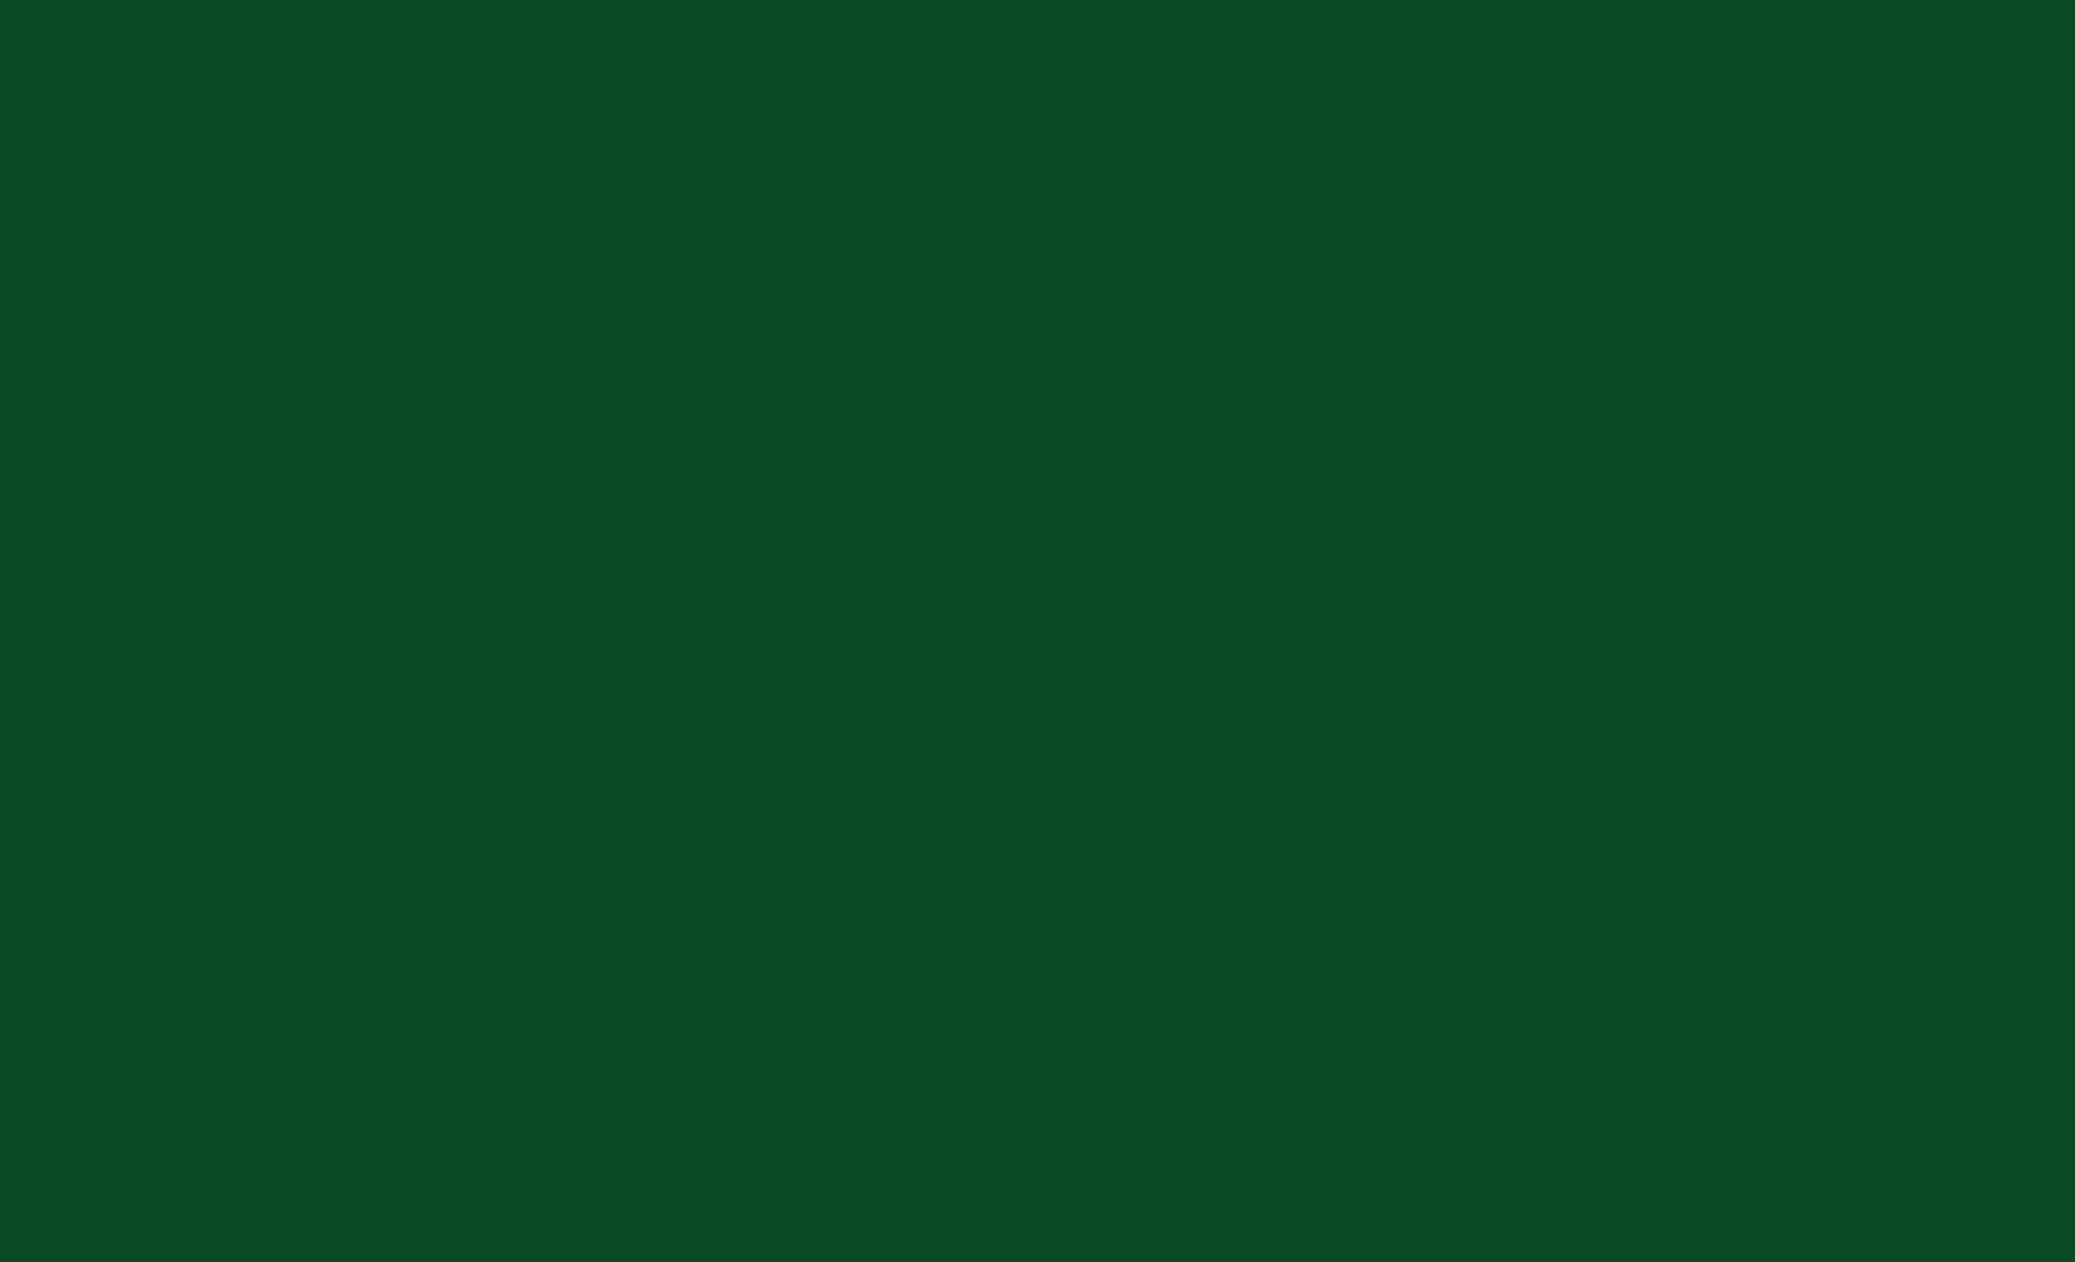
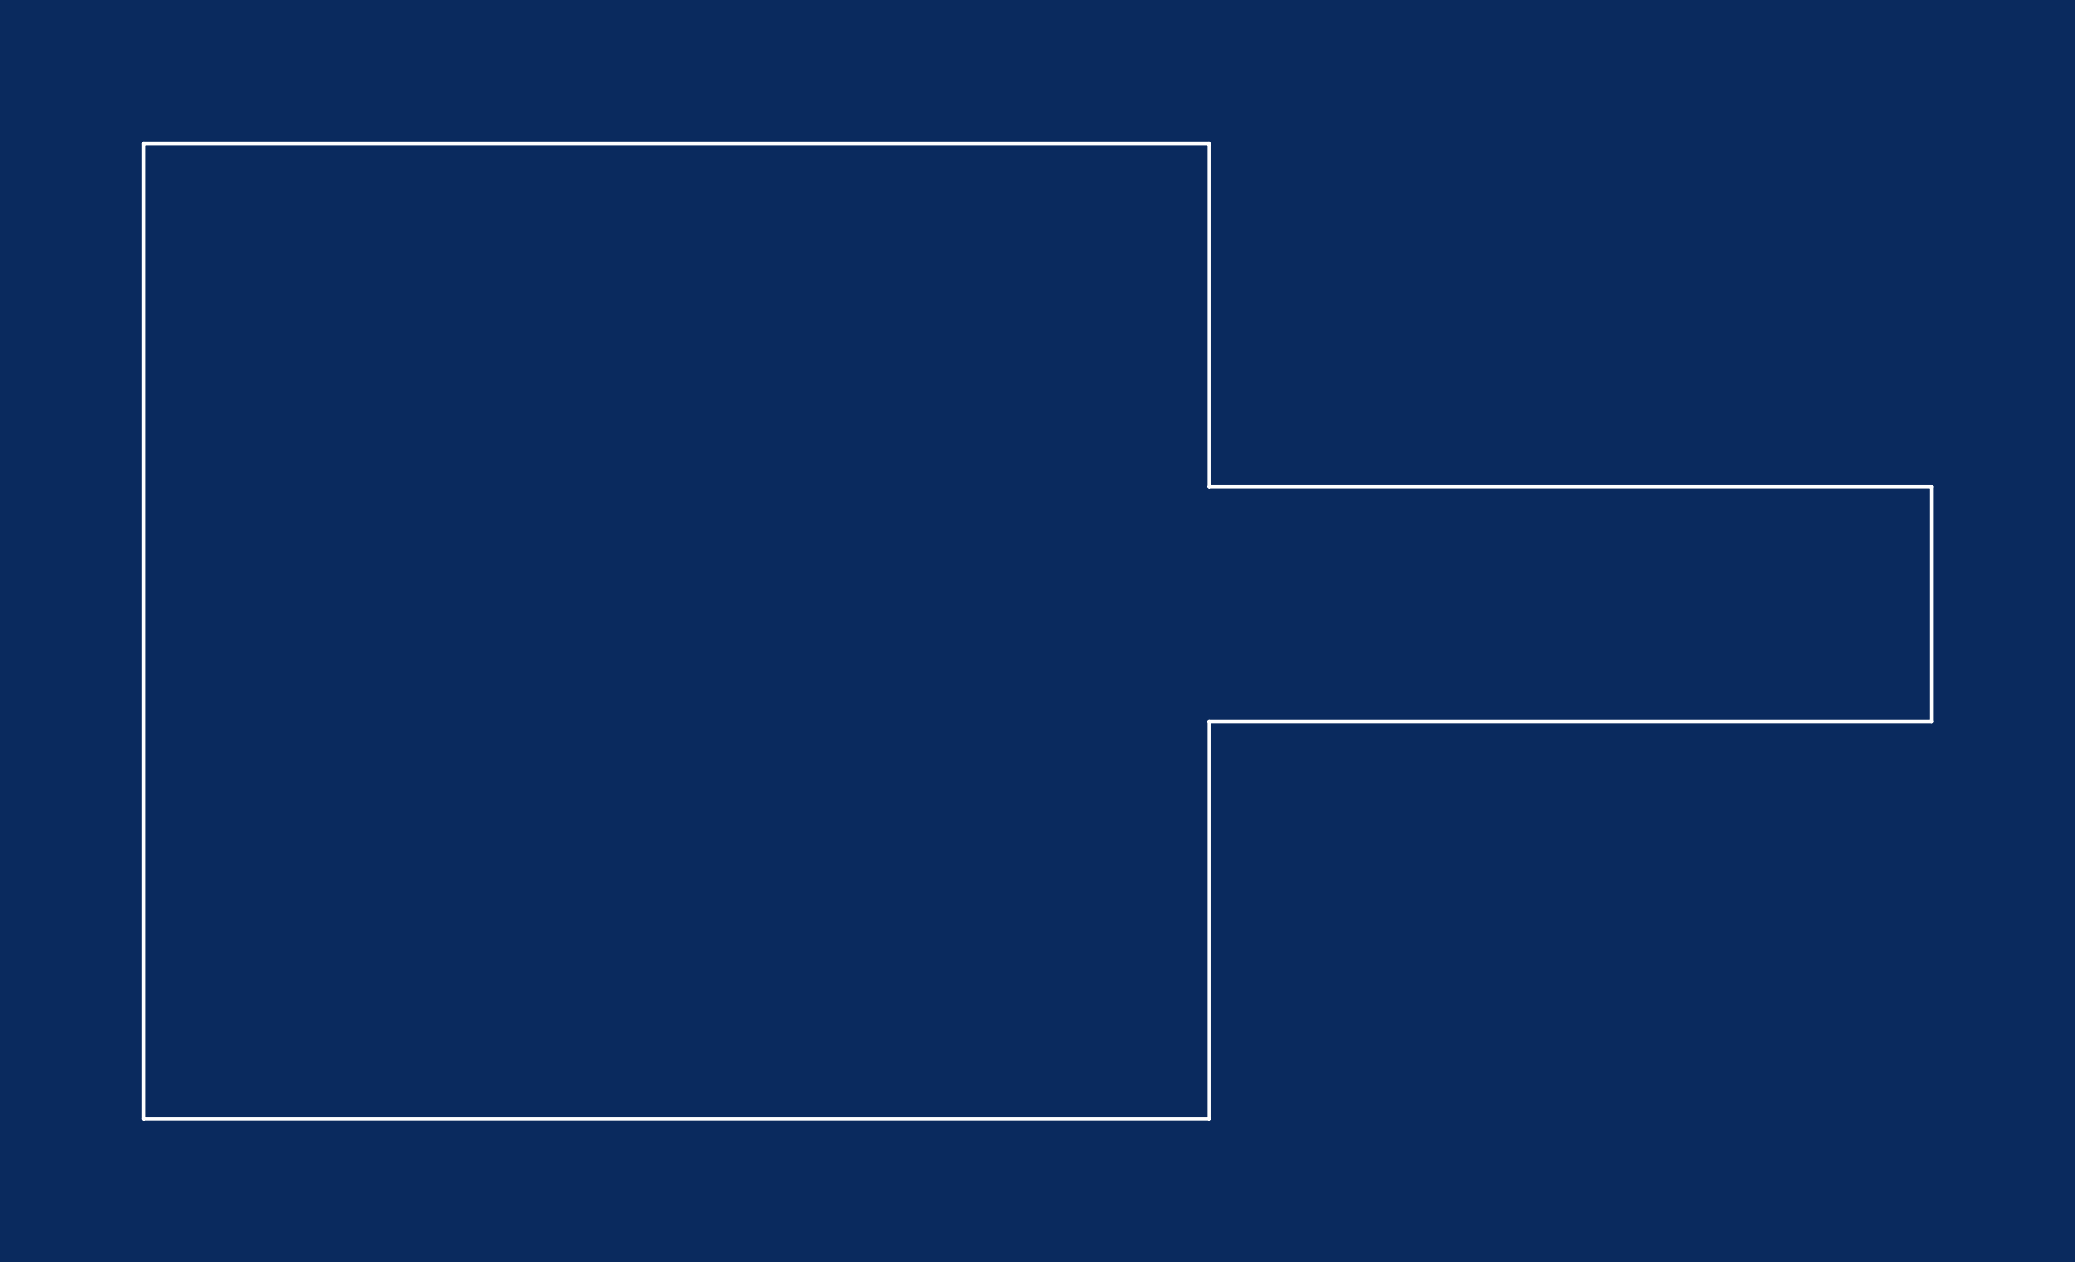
line: none -> (143, 143) (1209, 143) (1209, 486) (1931, 486) (1931, 721) (1209, 721) (1209, 1118) (143, 1118) (143, 143)

